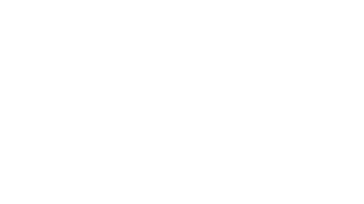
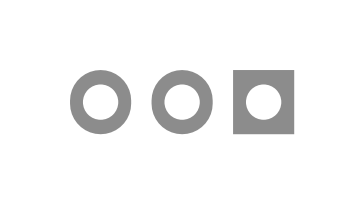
part: none -> (182, 102)

